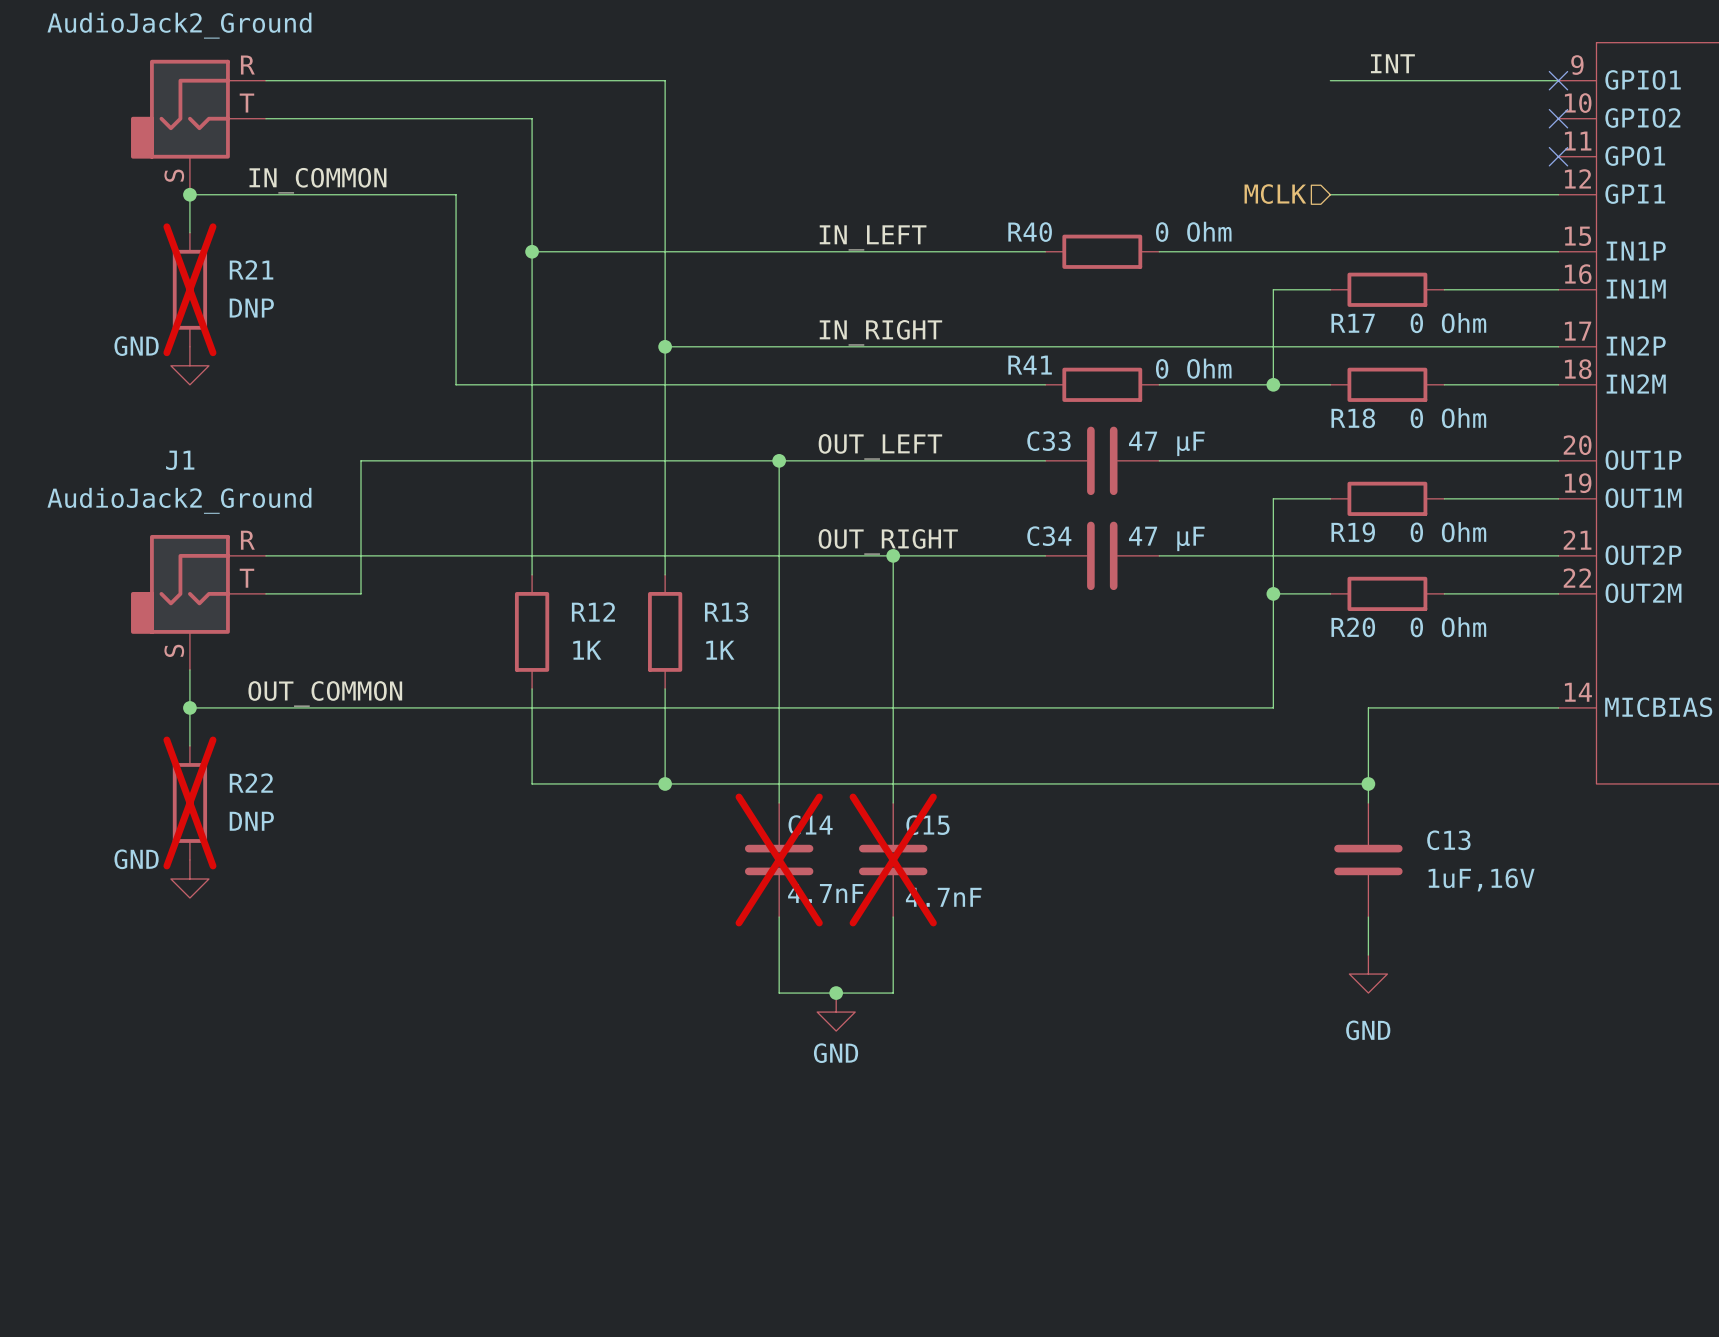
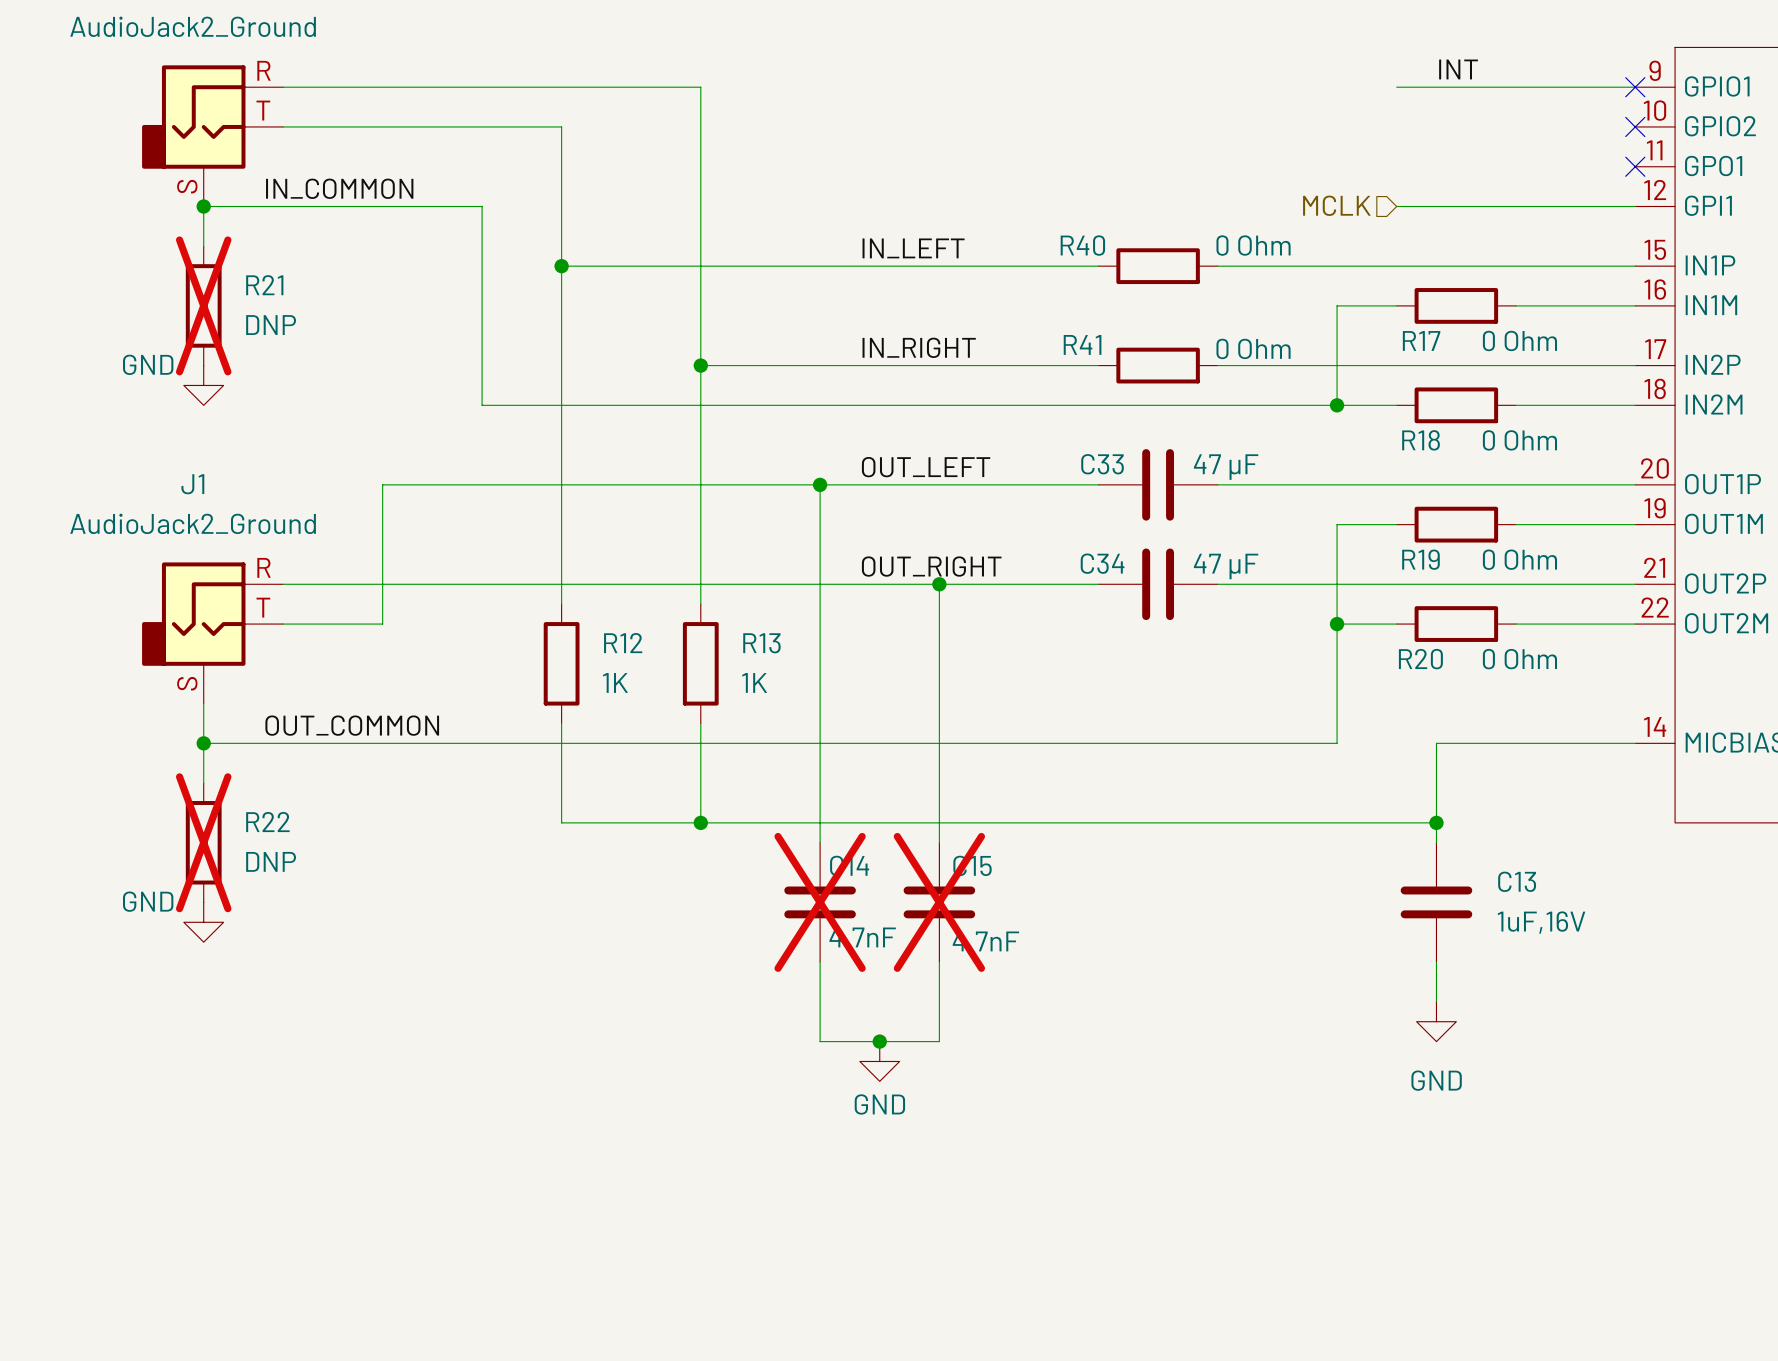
wire: (1045, 346) (1159, 346) -> (1098, 405) (1217, 405)
R41 position: (1102, 384) -> (1158, 365)

